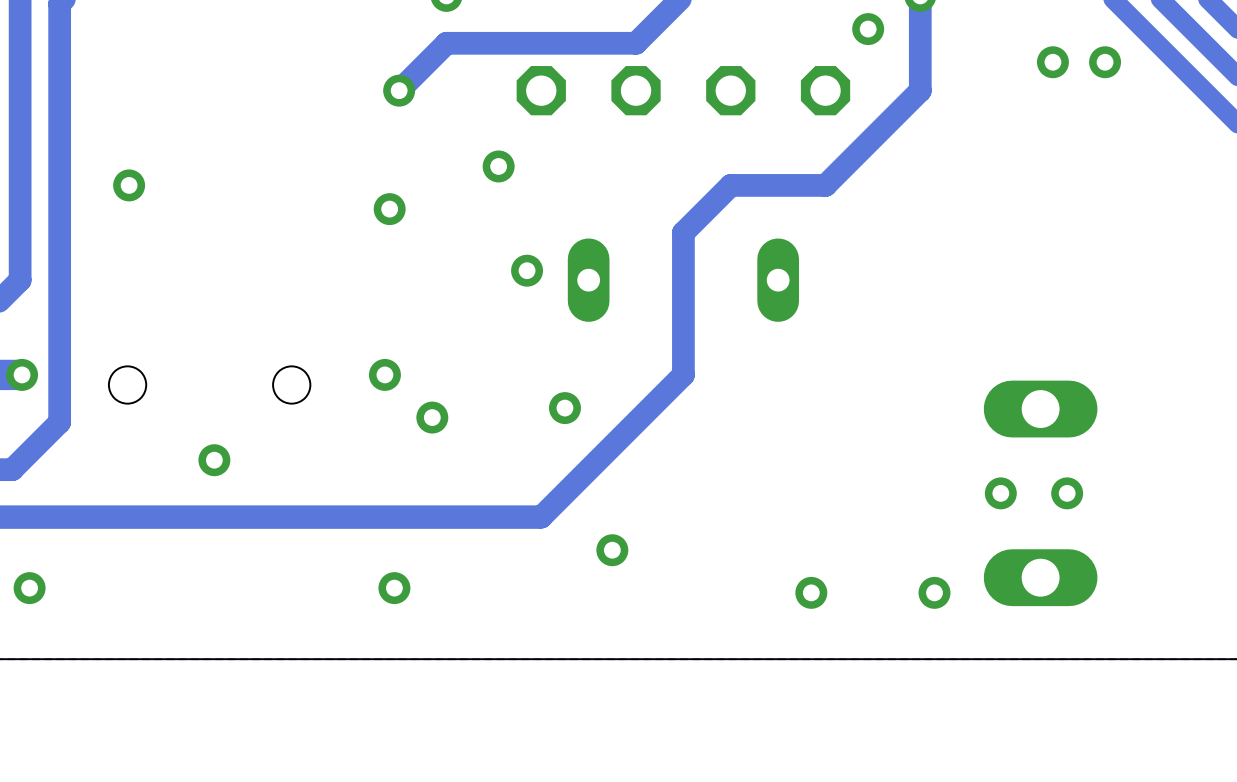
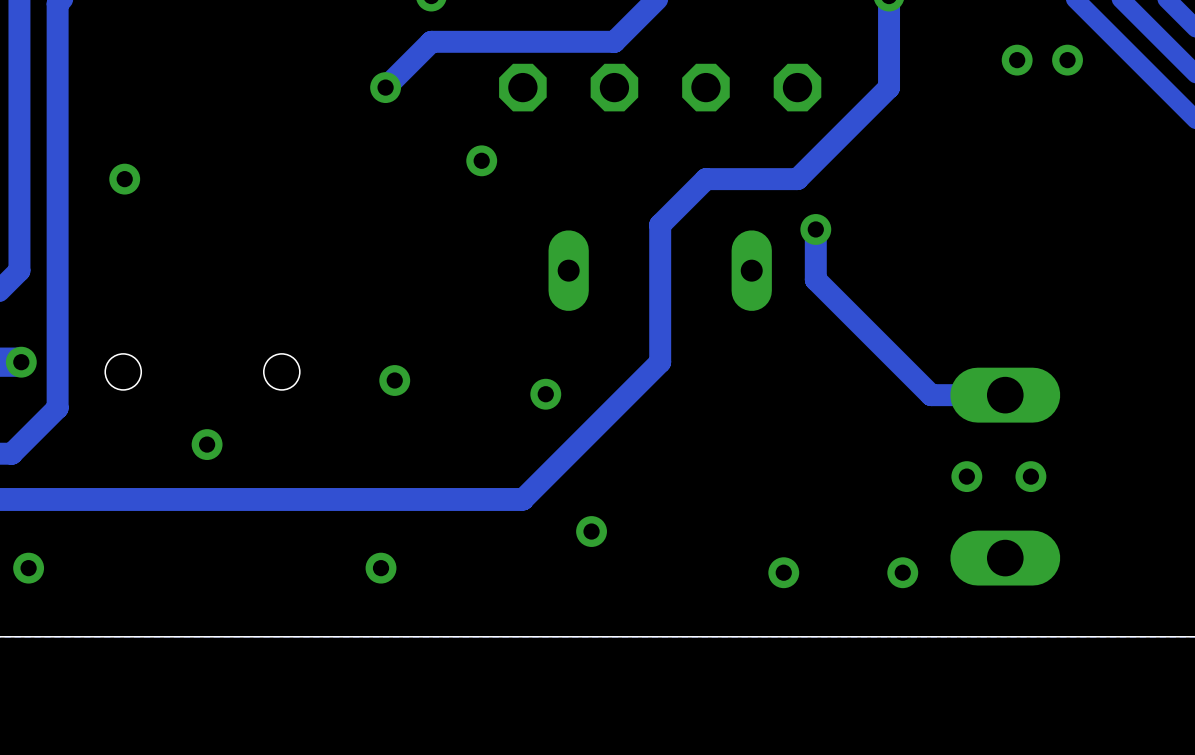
via: (868, 29) -> none
via: (389, 209) -> none
track: none -> (815, 229) (815, 279) (931, 395) (1005, 395)
via: none -> (815, 229)
via: (527, 270) -> none
via: (384, 374) -> none
via: none -> (394, 380)
via: (432, 417) -> none

